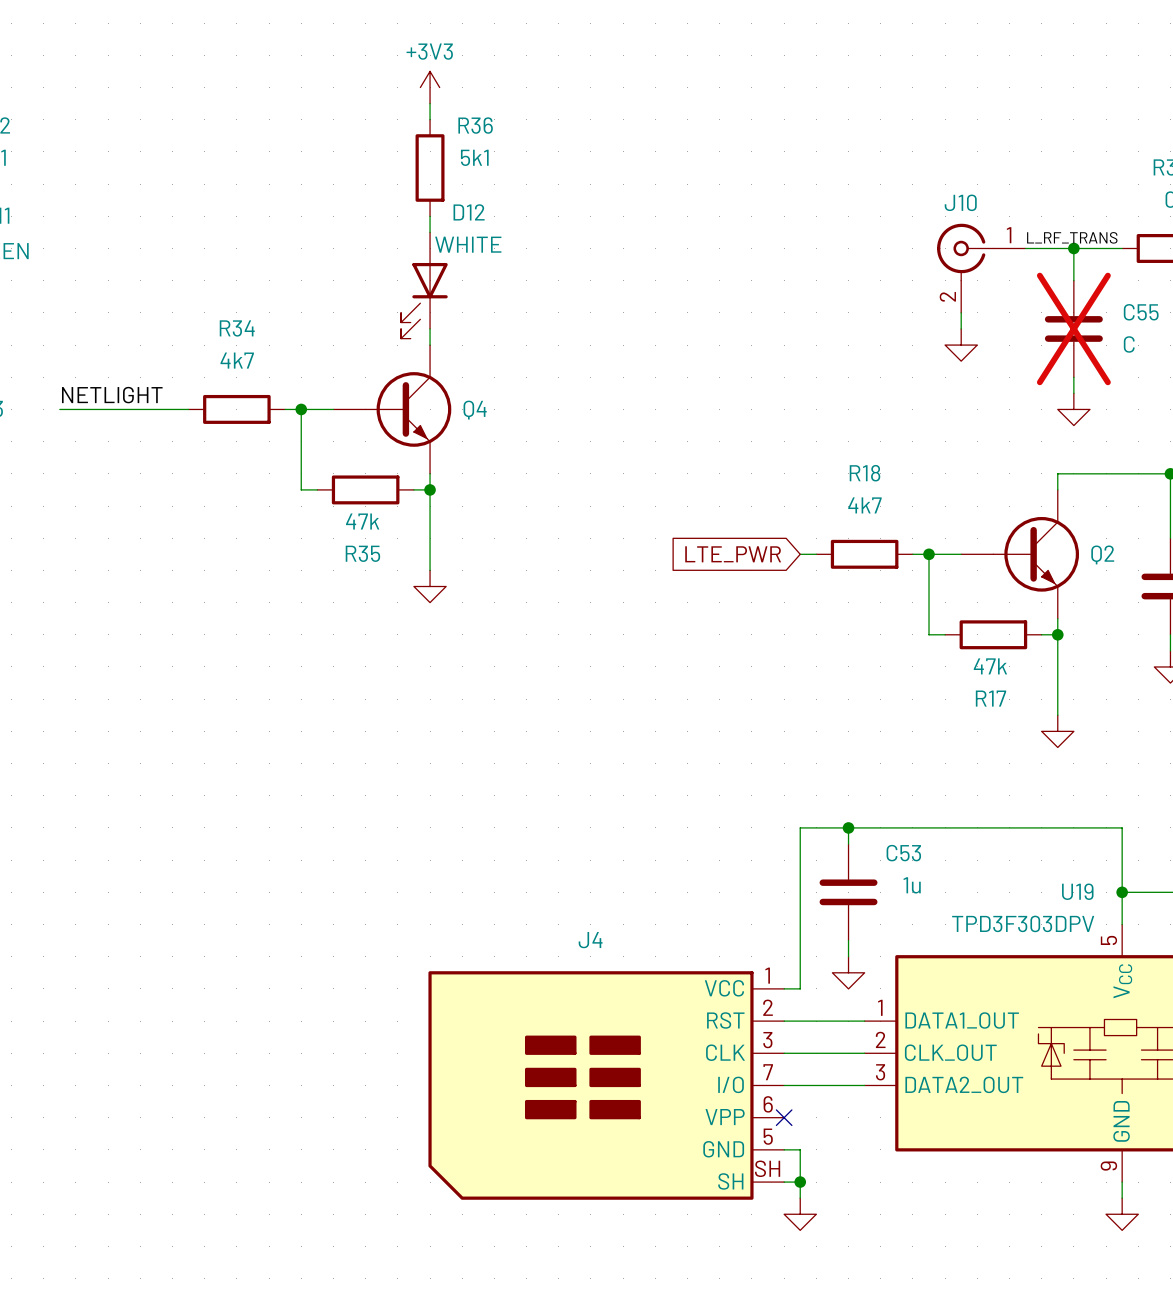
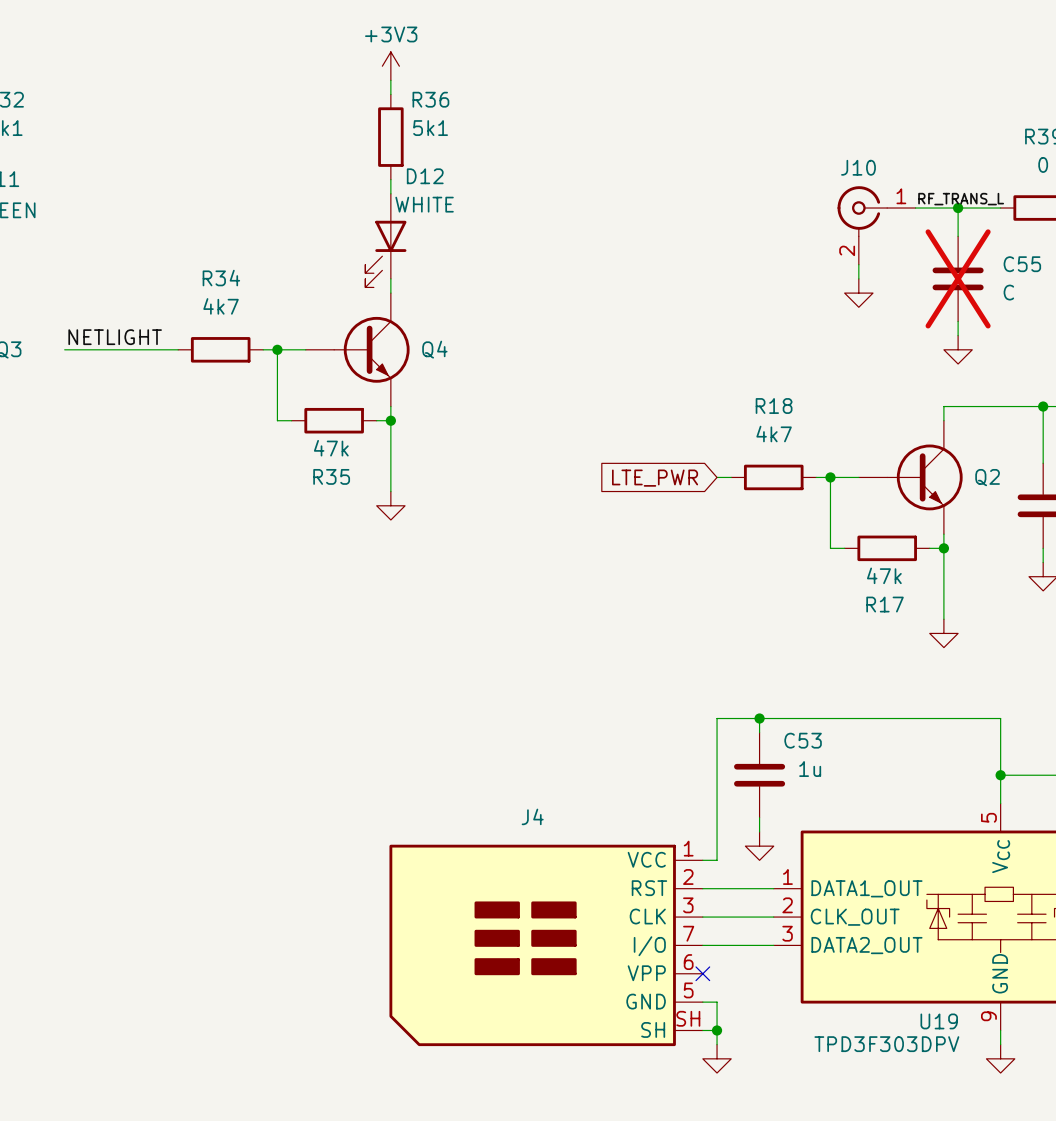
label: L_RF_TRANS (1072, 237) -> RF_TRANS_L (961, 199)
U19 name position: U19 (1077, 891) -> U19 (939, 1021)
U19 value position: TPD3F303DPV (1023, 923) -> TPD3F303DPV (886, 1044)

